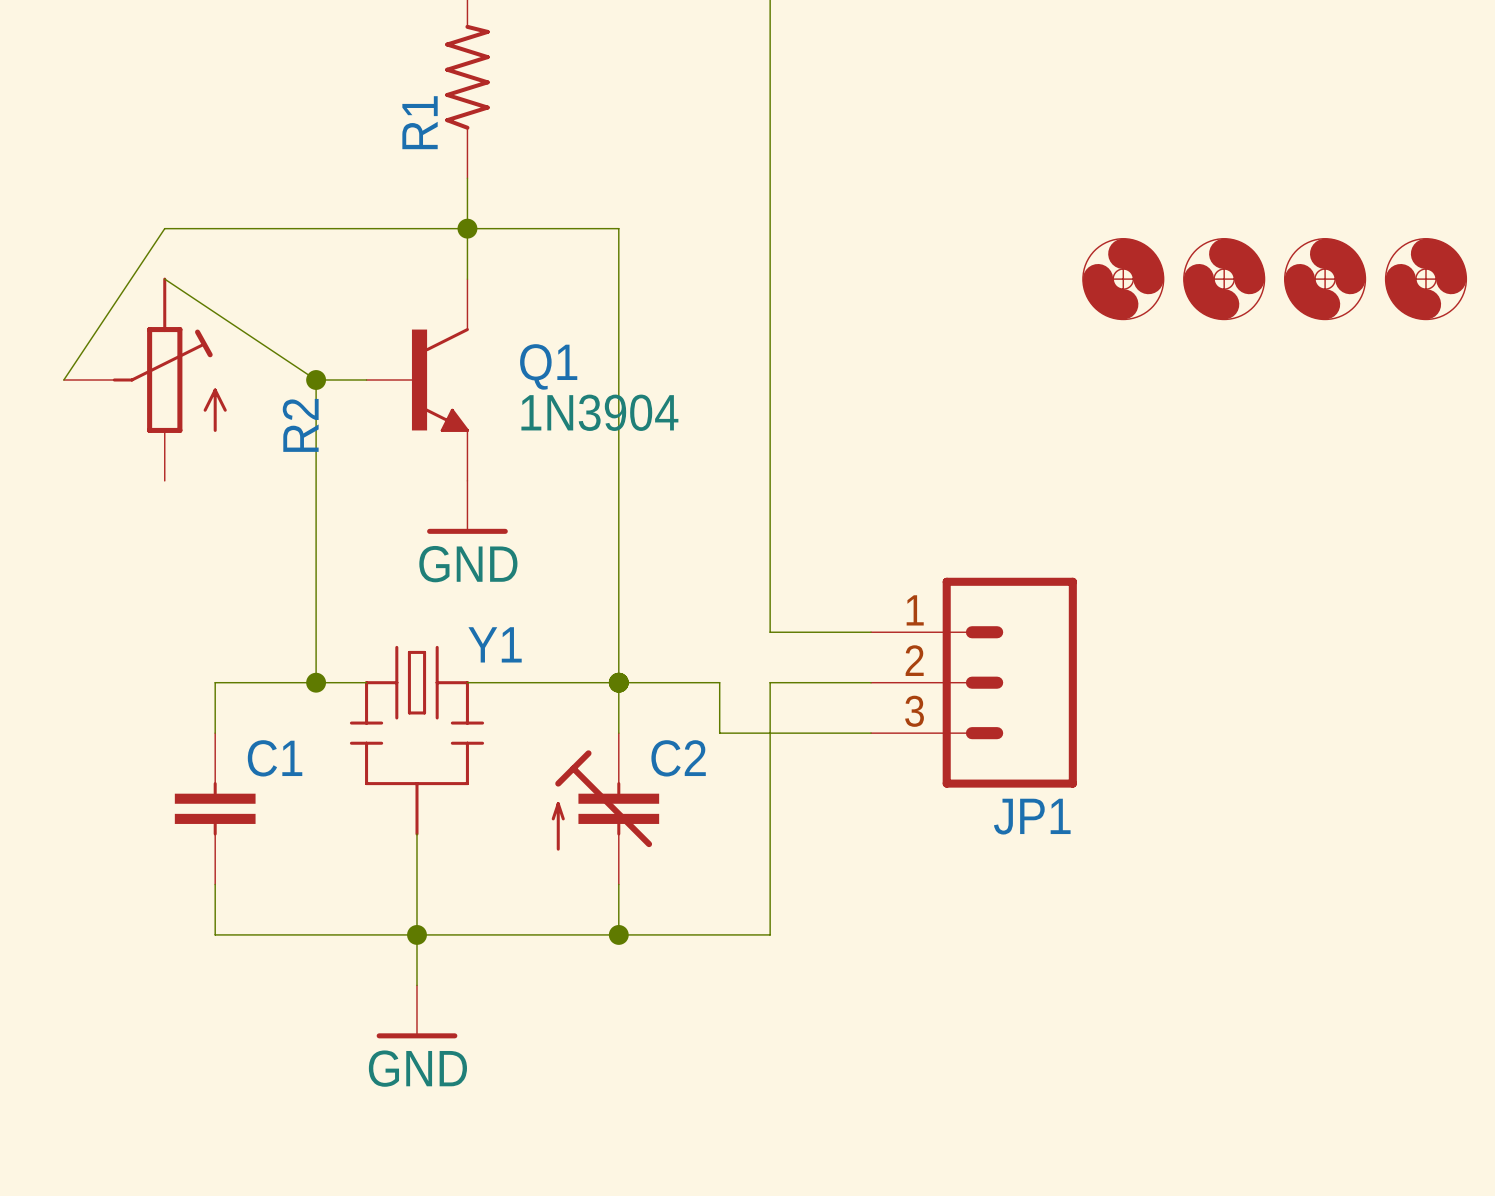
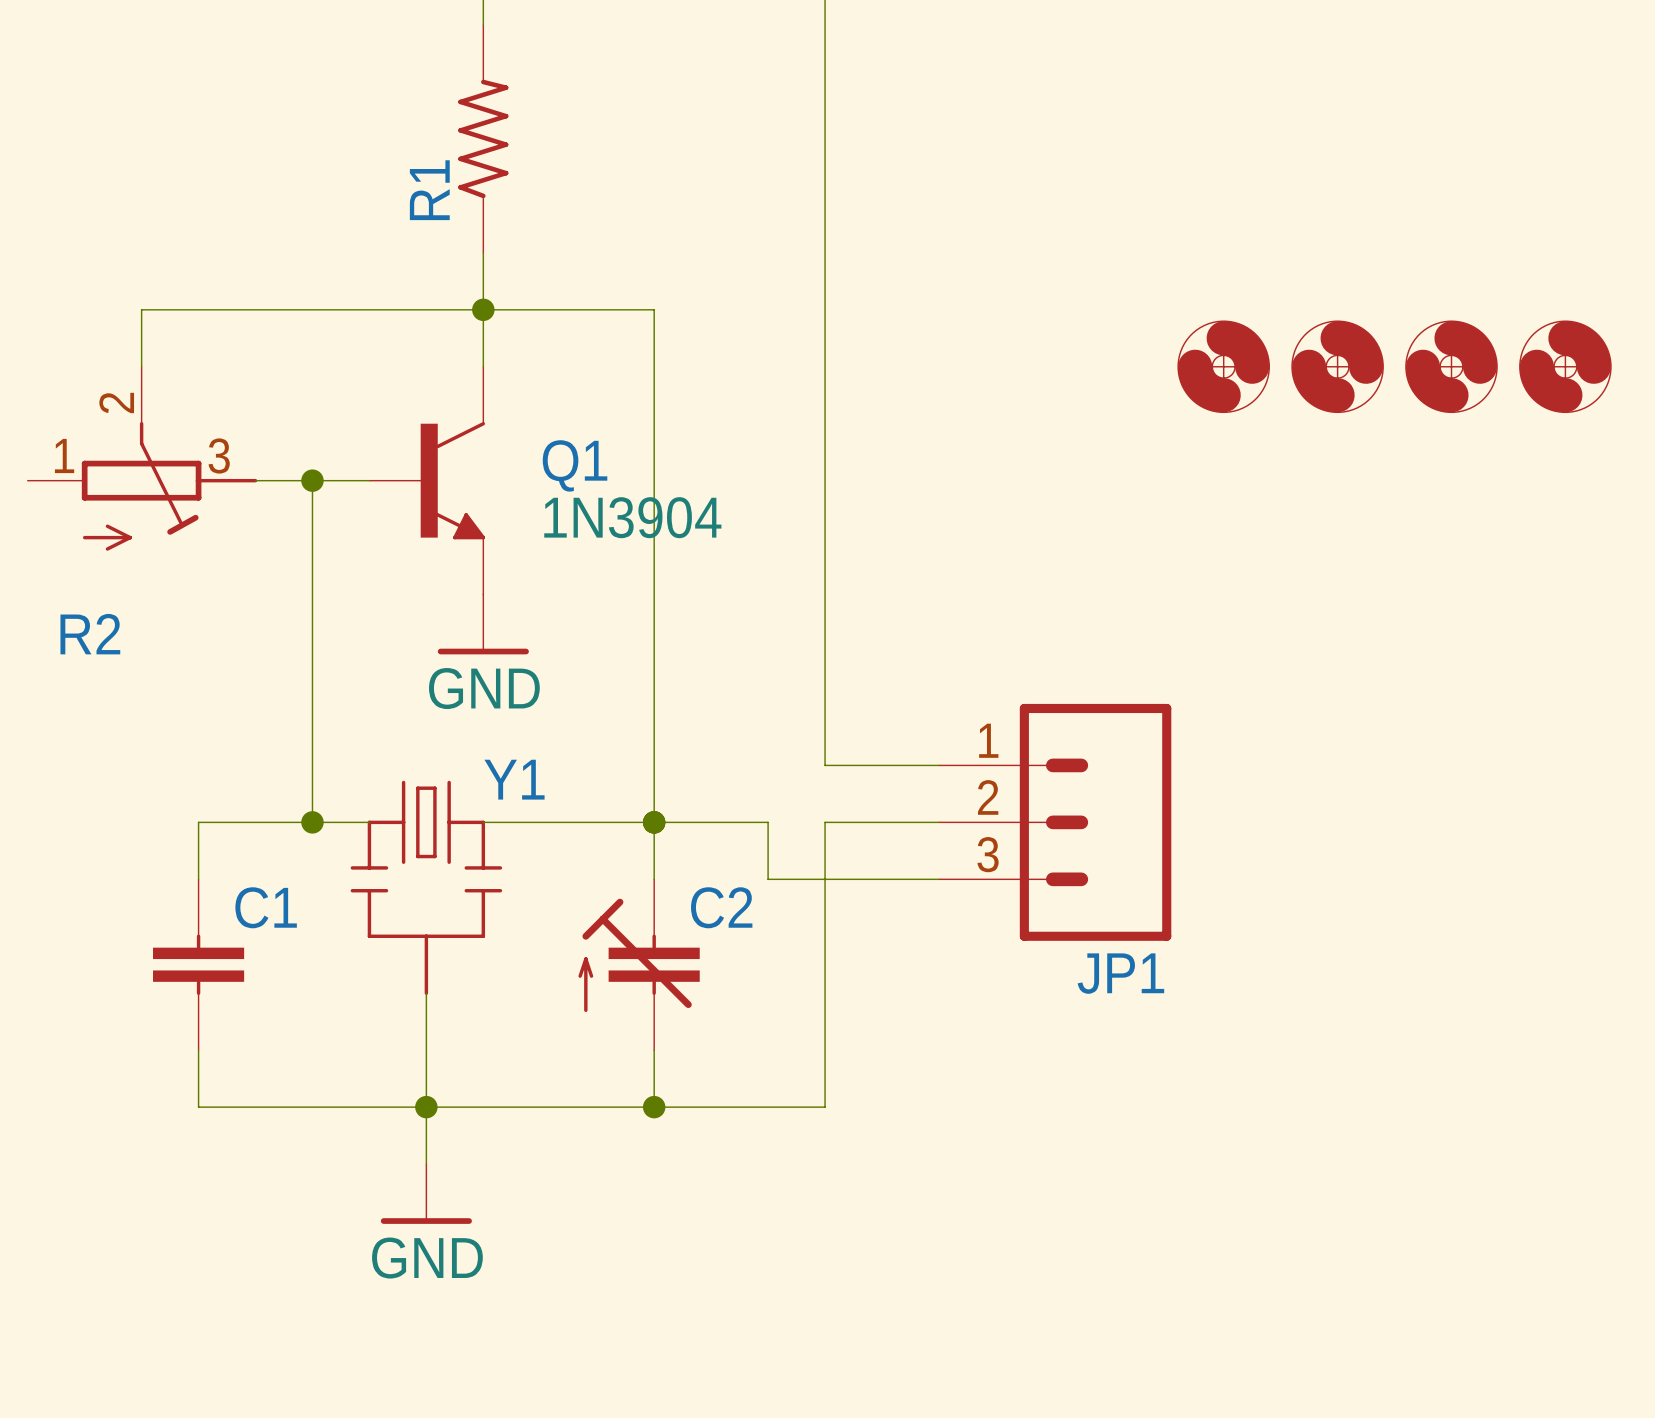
wire: (164, 228) (63, 380) -> (141, 309) (141, 366)
R2 symbol: [63, 277, 227, 481] -> [27, 366, 258, 551]
wire: (164, 279) (316, 380) -> (255, 480) (312, 480)
R2 name position: R2 (300, 425) -> R2 (90, 634)

